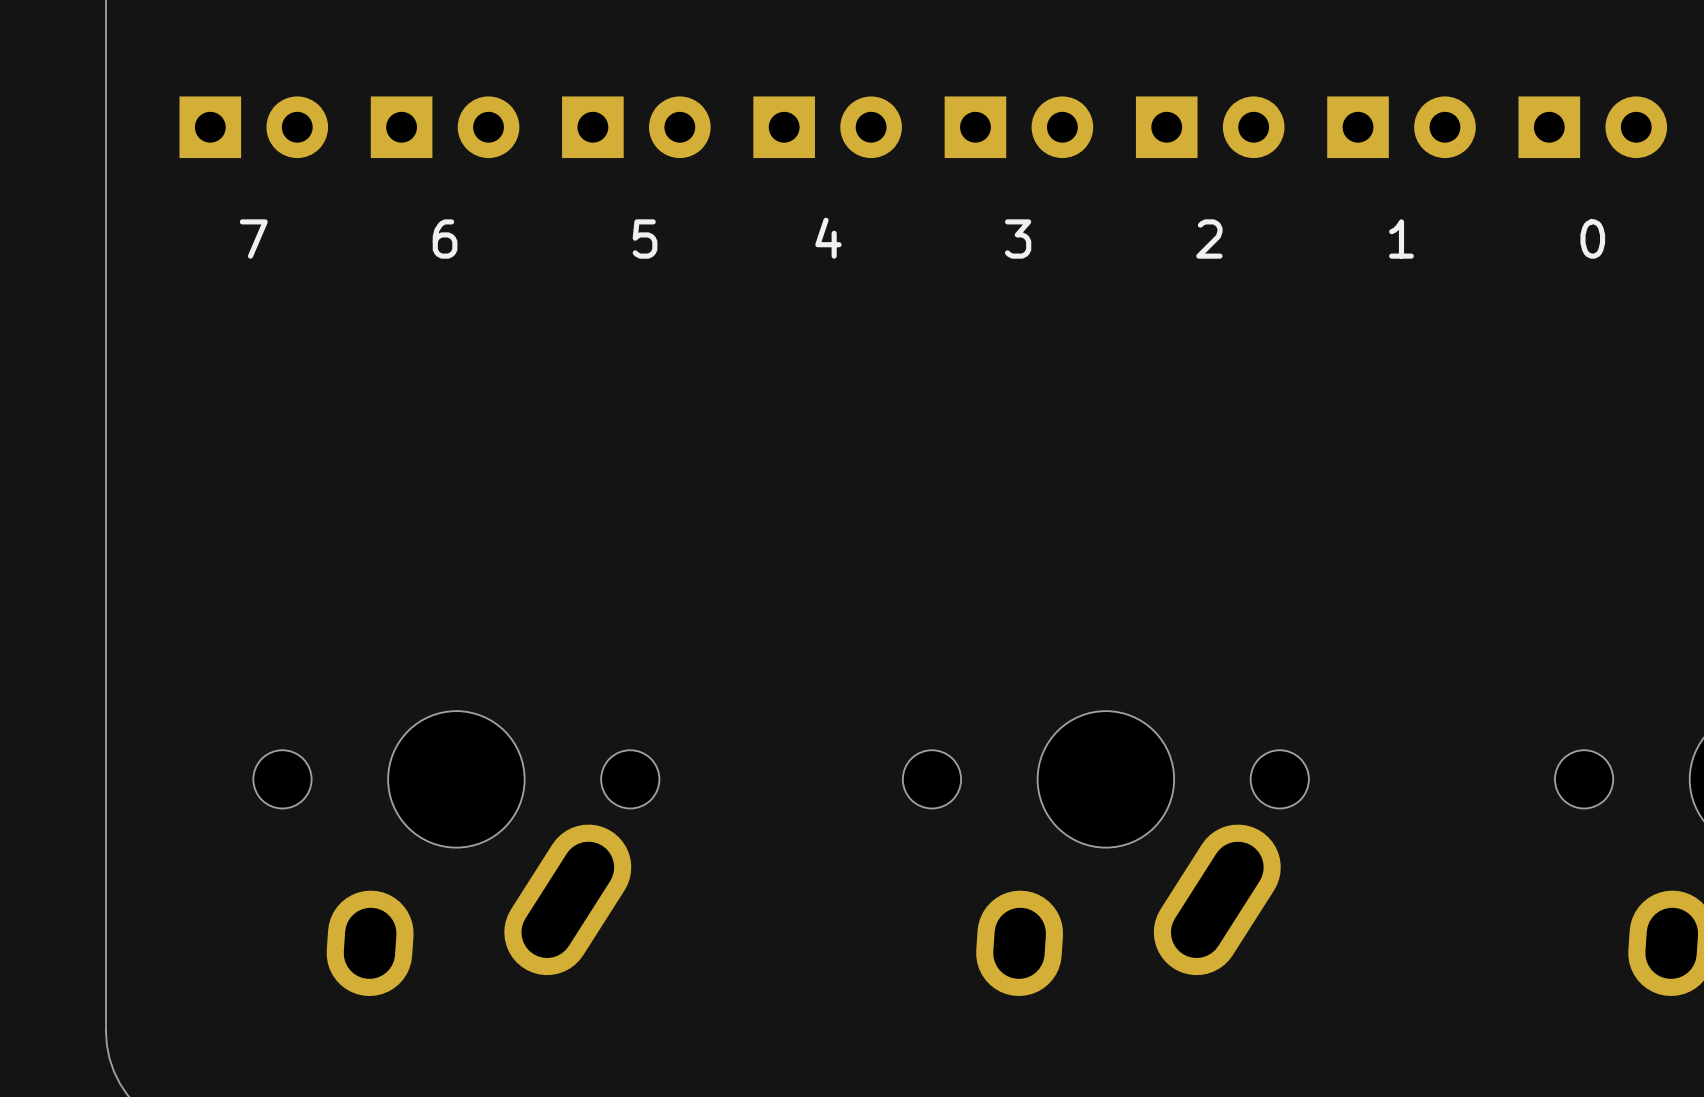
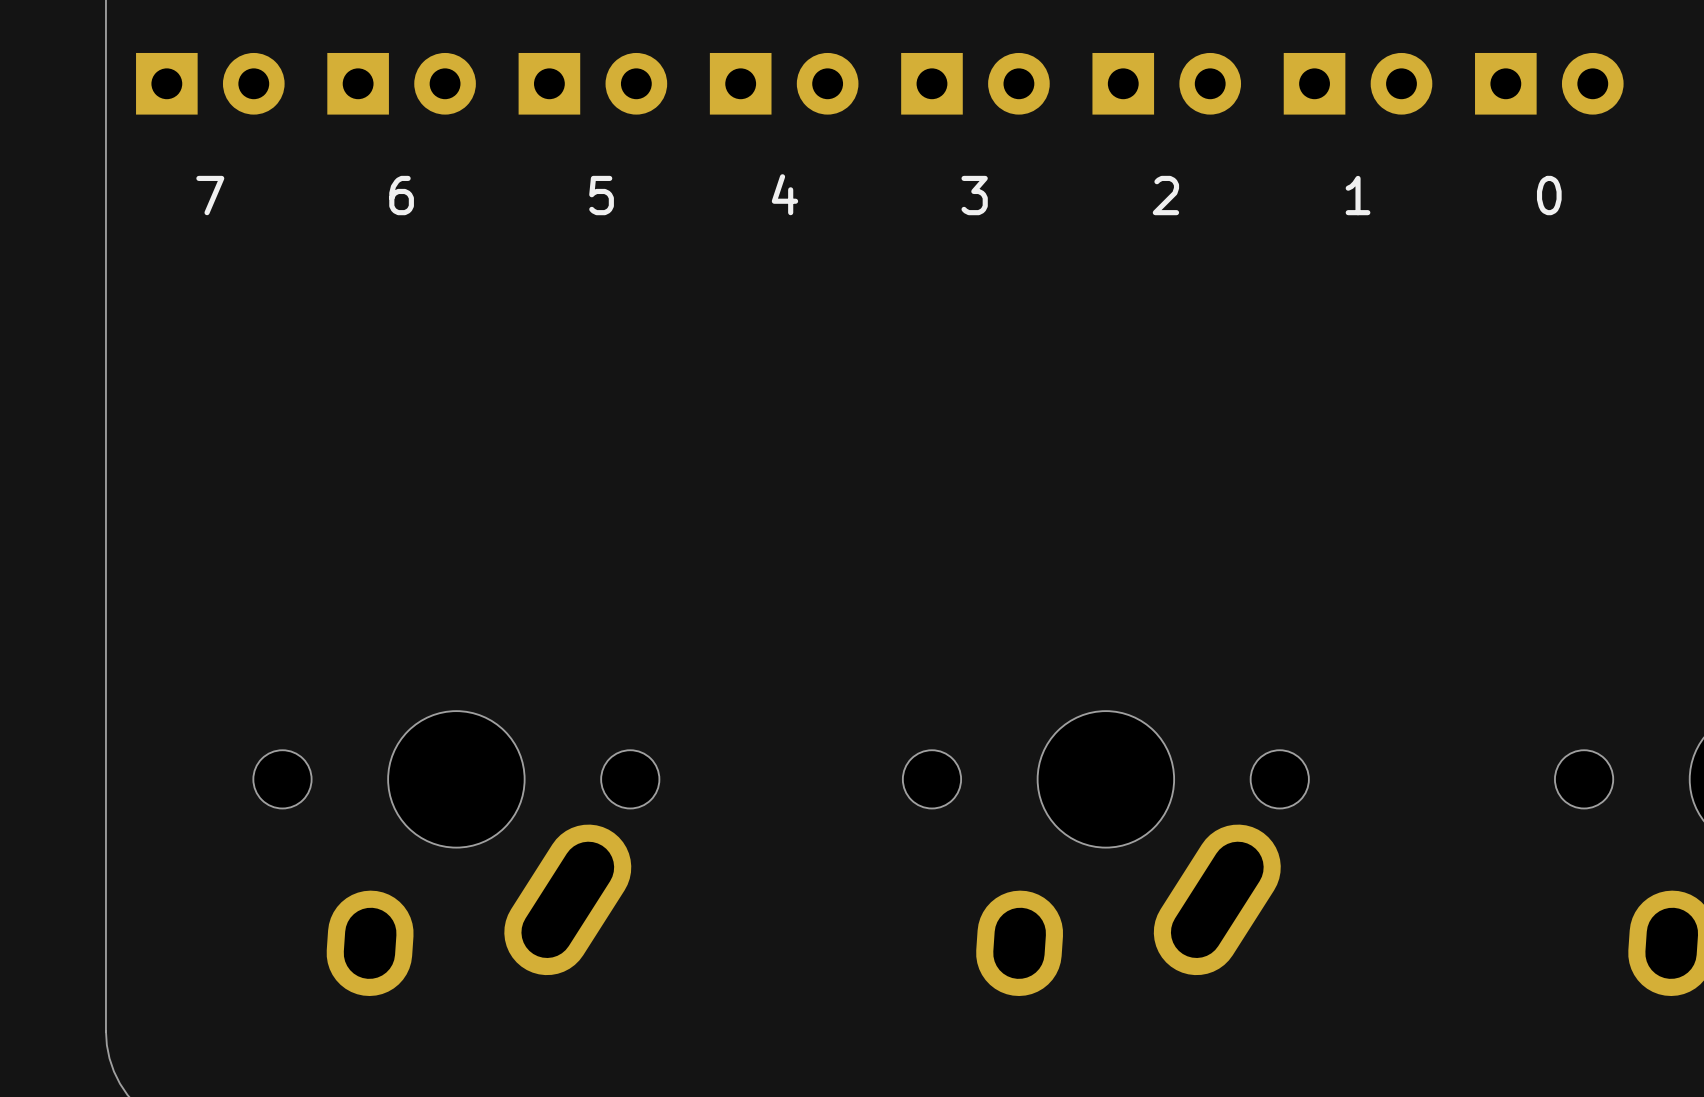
7 position: (253, 127) -> (210, 83)
6 position: (445, 127) -> (401, 83)
5 position: (636, 127) -> (592, 83)
4 position: (827, 127) -> (784, 83)
3 position: (1018, 127) -> (975, 83)
2 position: (1210, 127) -> (1166, 83)
1 position: (1401, 127) -> (1358, 83)
0 position: (1592, 127) -> (1549, 83)

